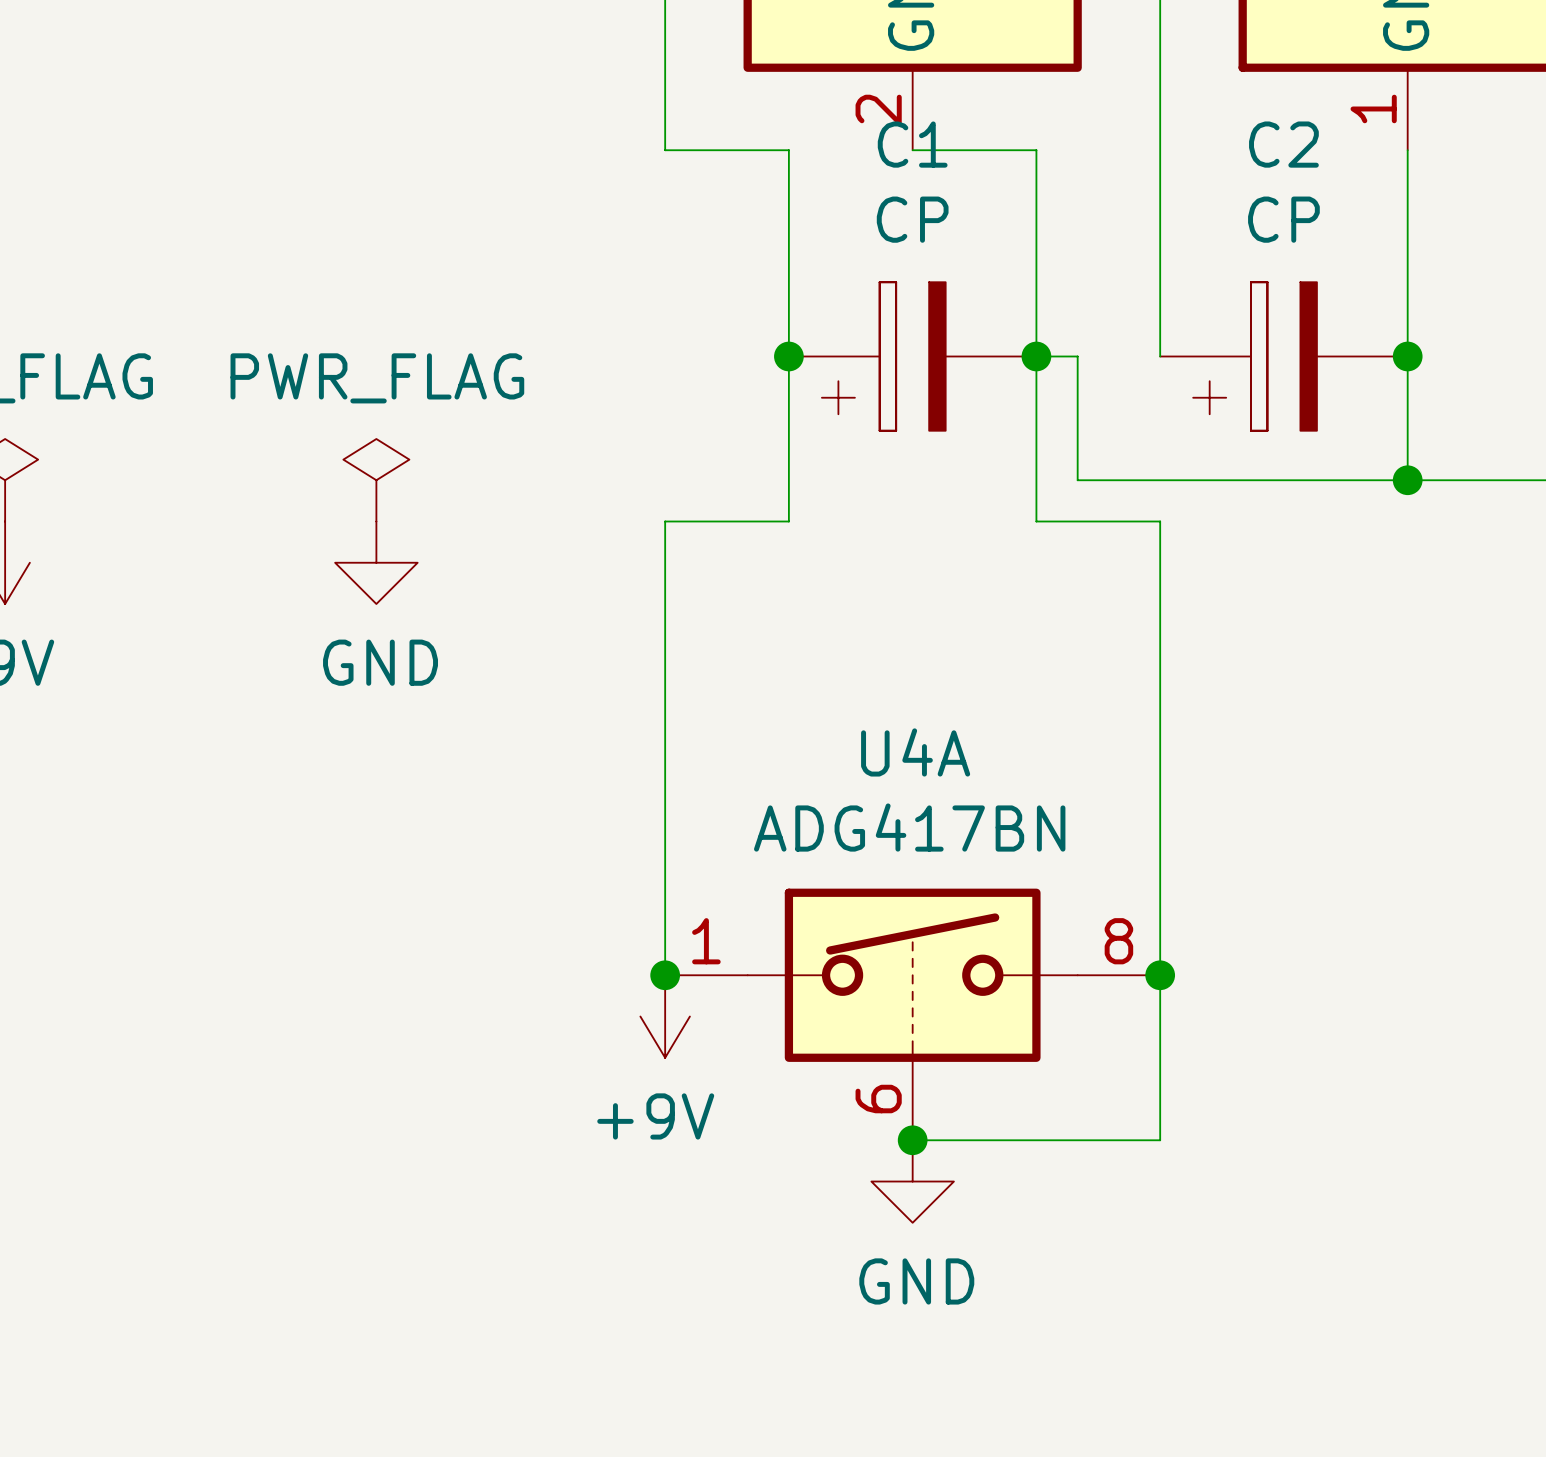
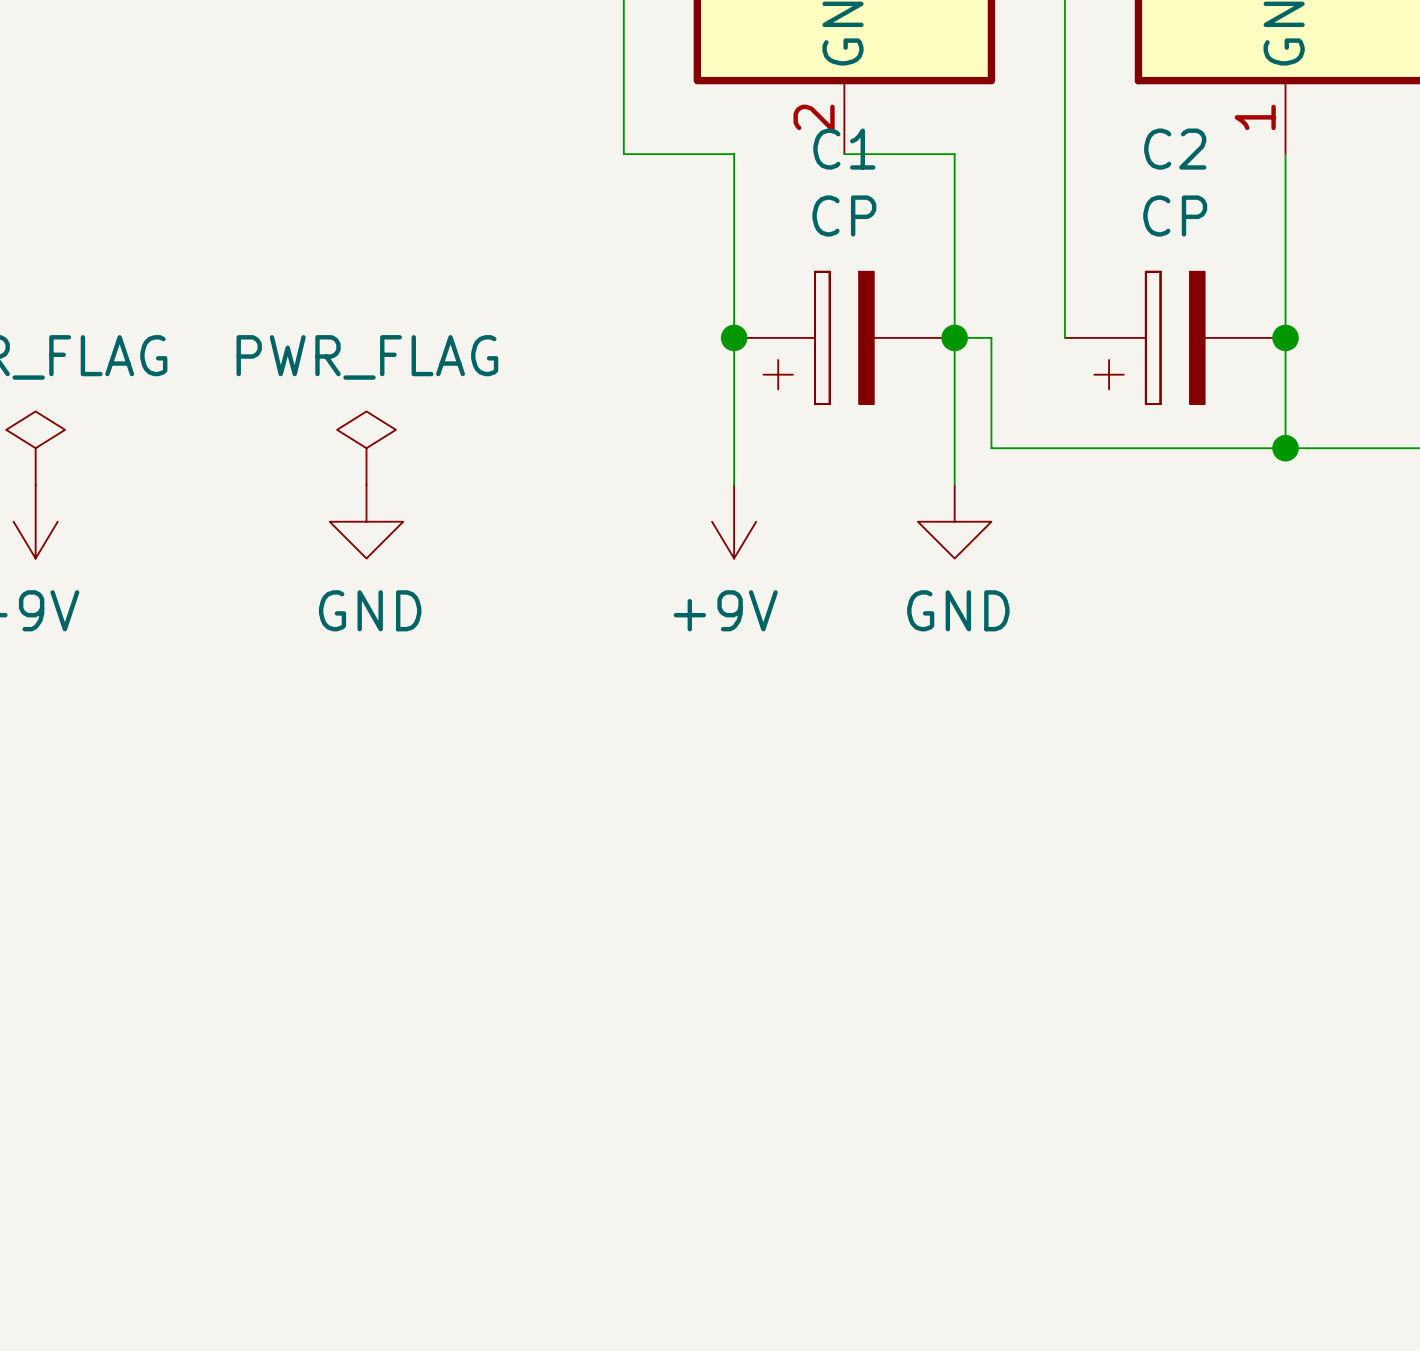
wire: (788, 521) (665, 521) (665, 975) -> none
wire: (1036, 521) (1160, 521) (1160, 1140) (912, 1140) -> none
junction: (665, 975) -> none
junction: (1160, 975) -> none
U4A: ADG417BN (912, 1014) -> none
power symbol position: +9V (665, 1016) -> +9V (734, 521)
junction: (912, 1140) -> none
power symbol position: GND (912, 1181) -> GND (954, 521)

